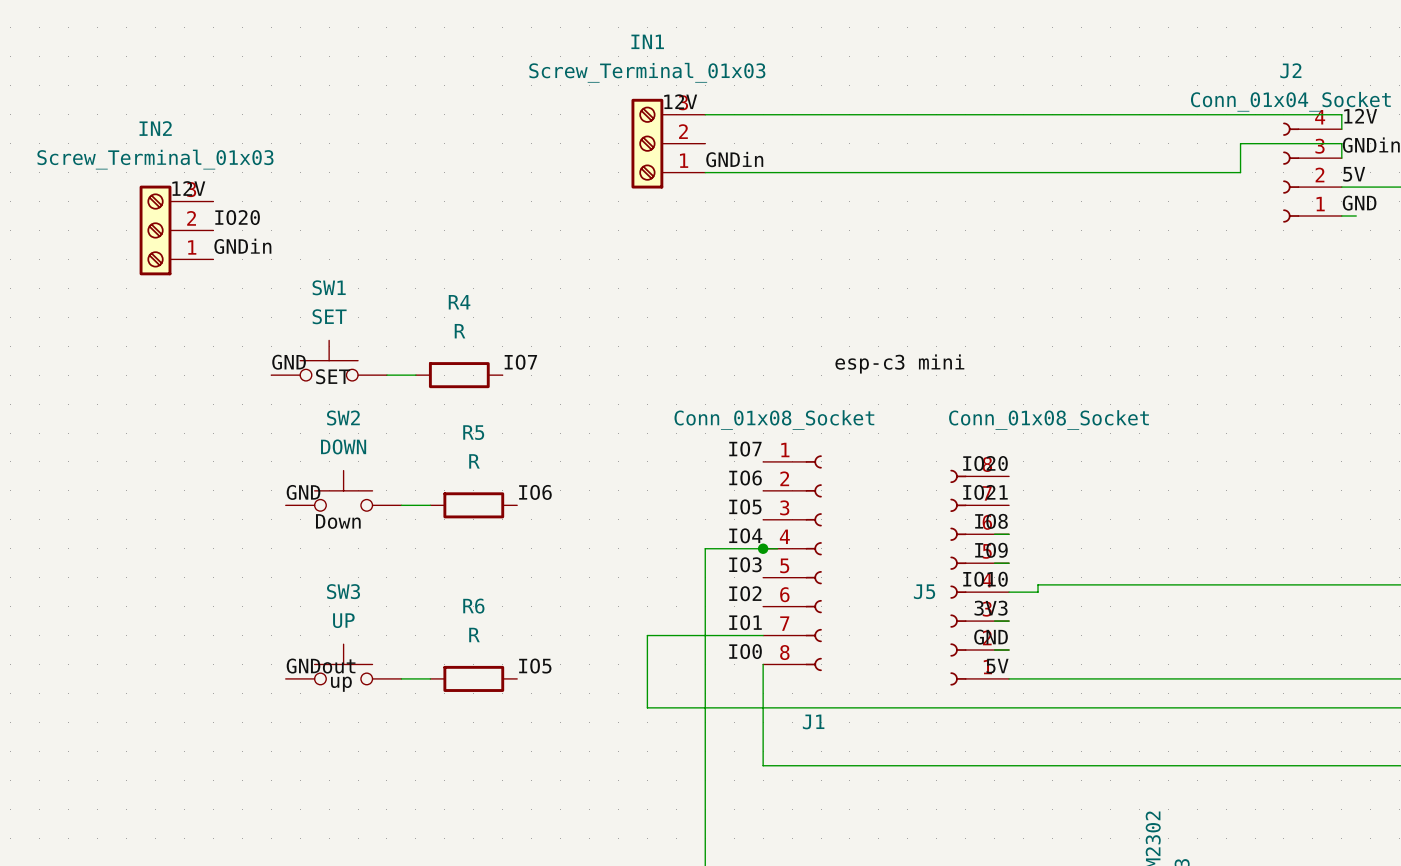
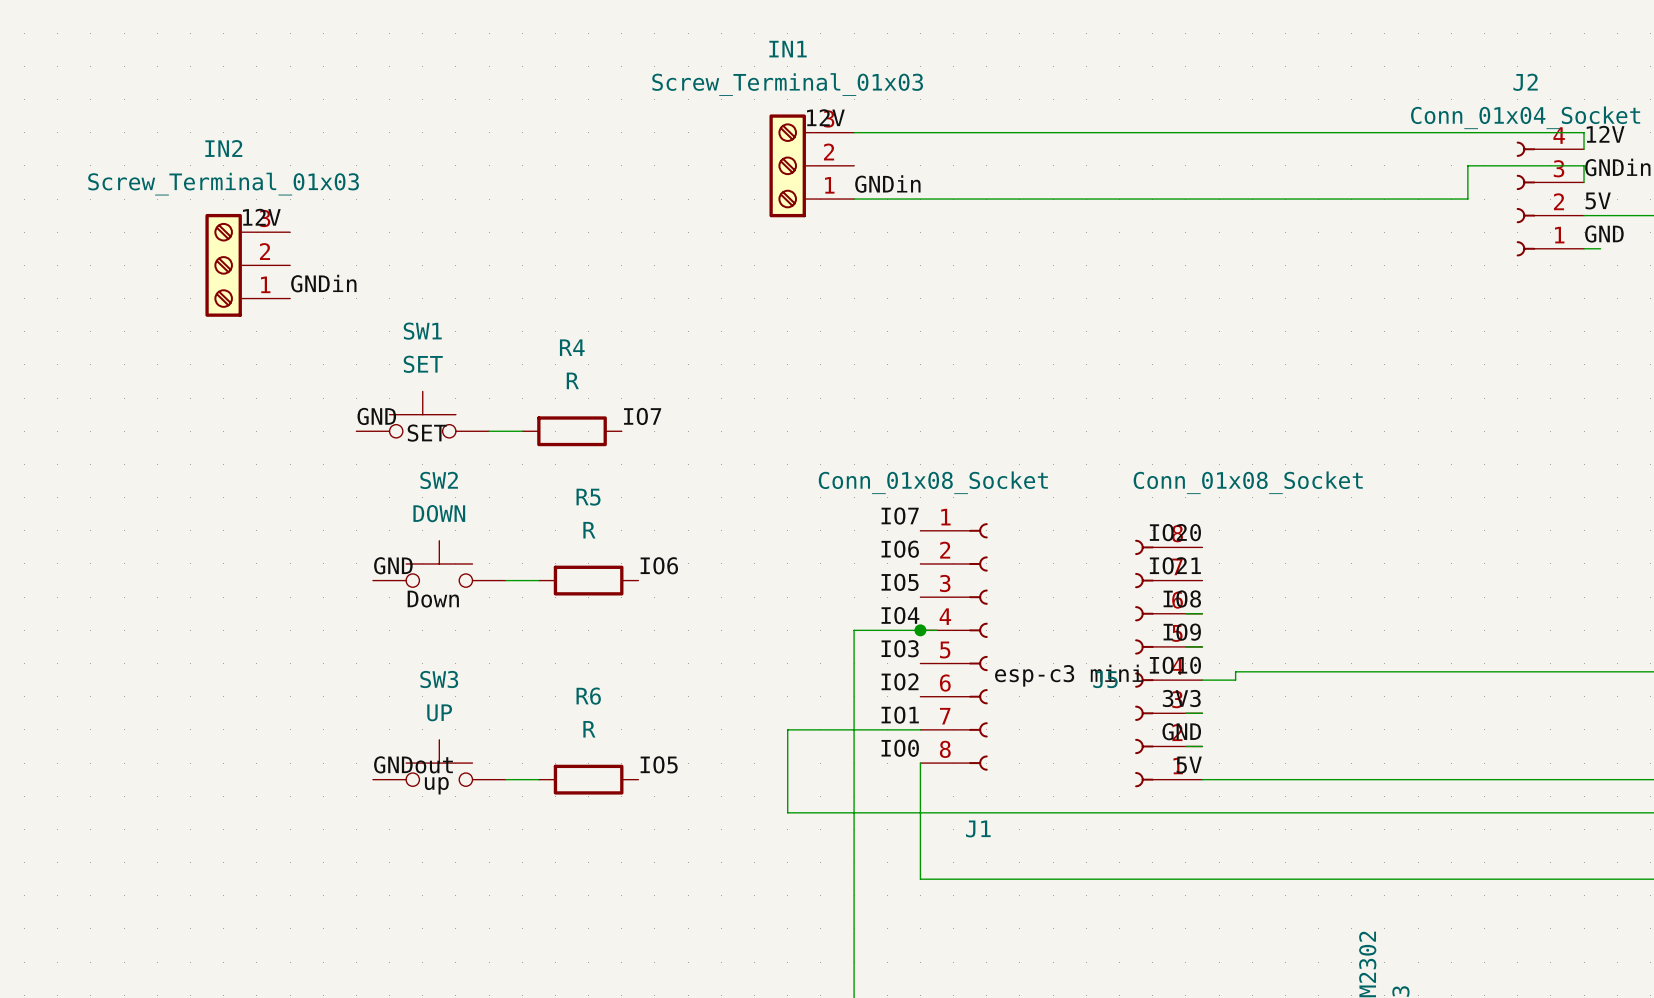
label: IO20 (237, 217) -> none
label position: esp-c3 mini (899, 363) -> esp-c3 mini (1068, 675)

